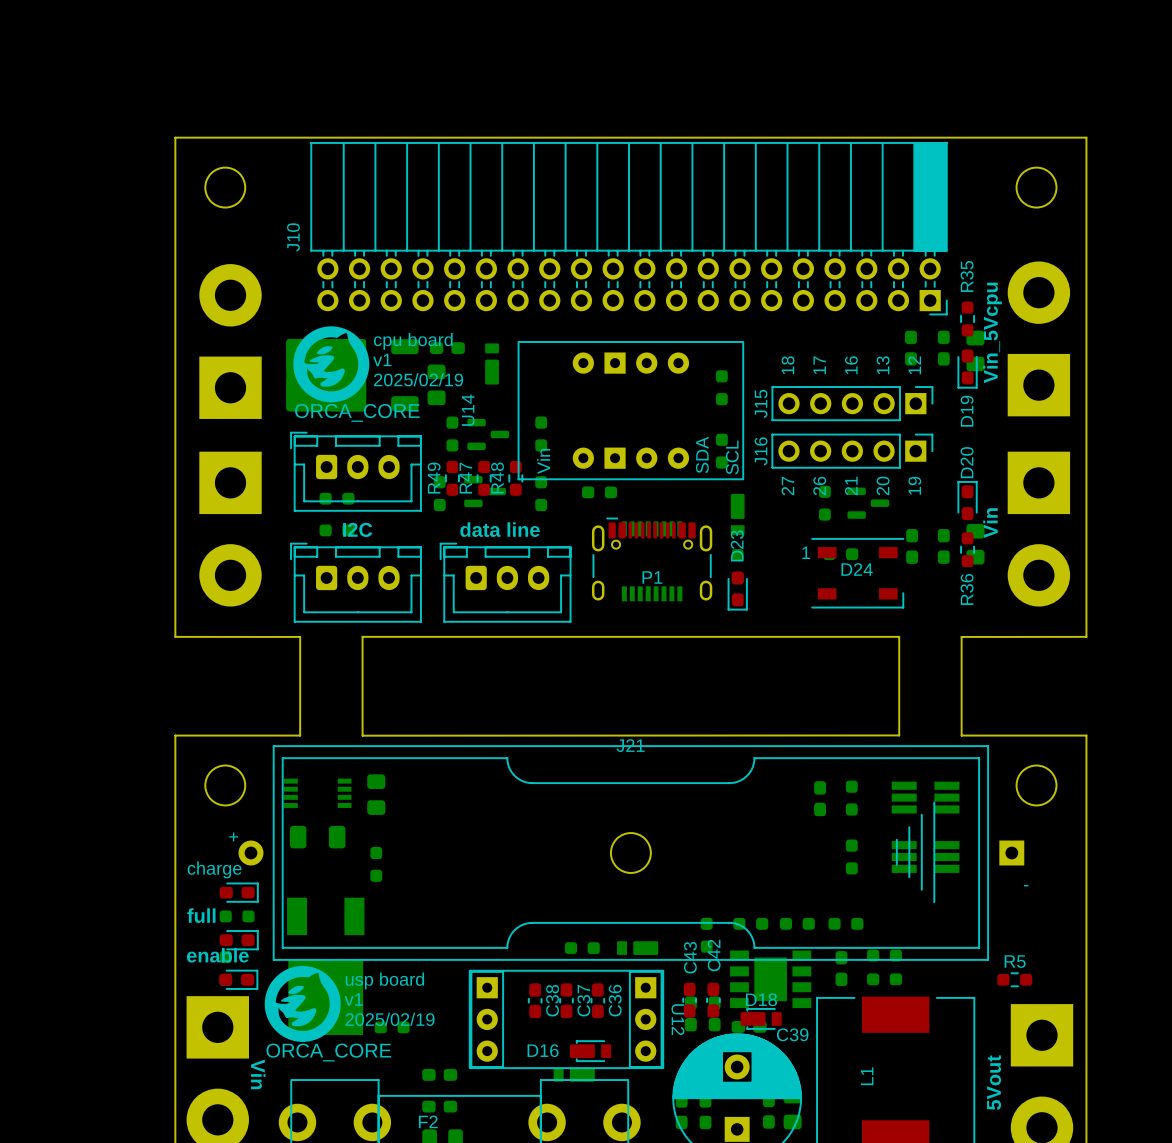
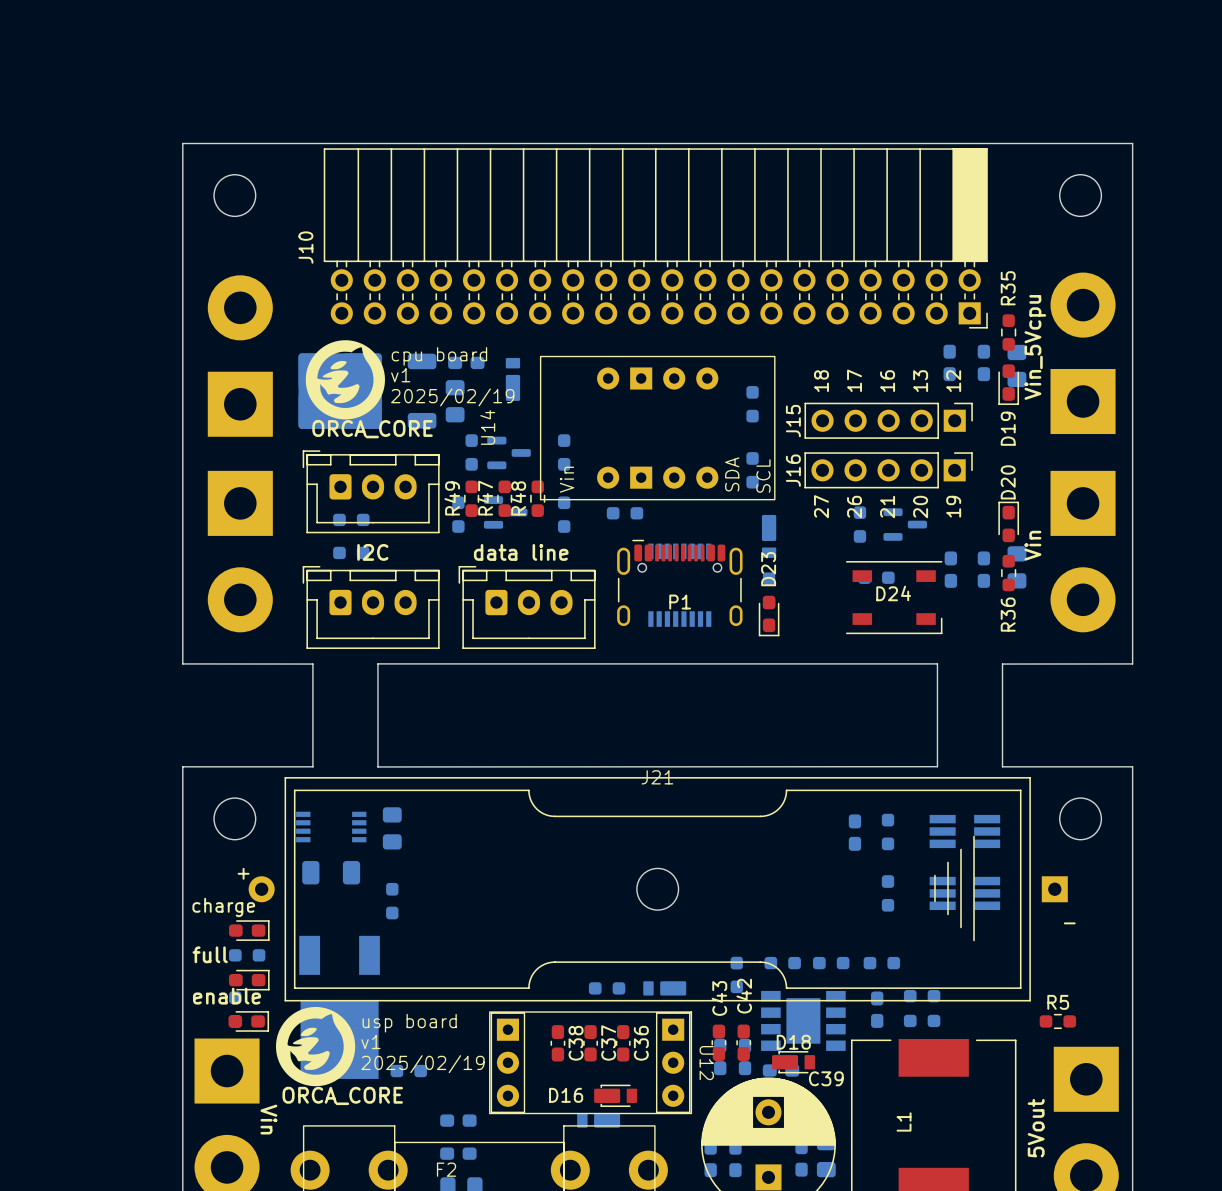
D24 text: 1 (806, 552) -> none

